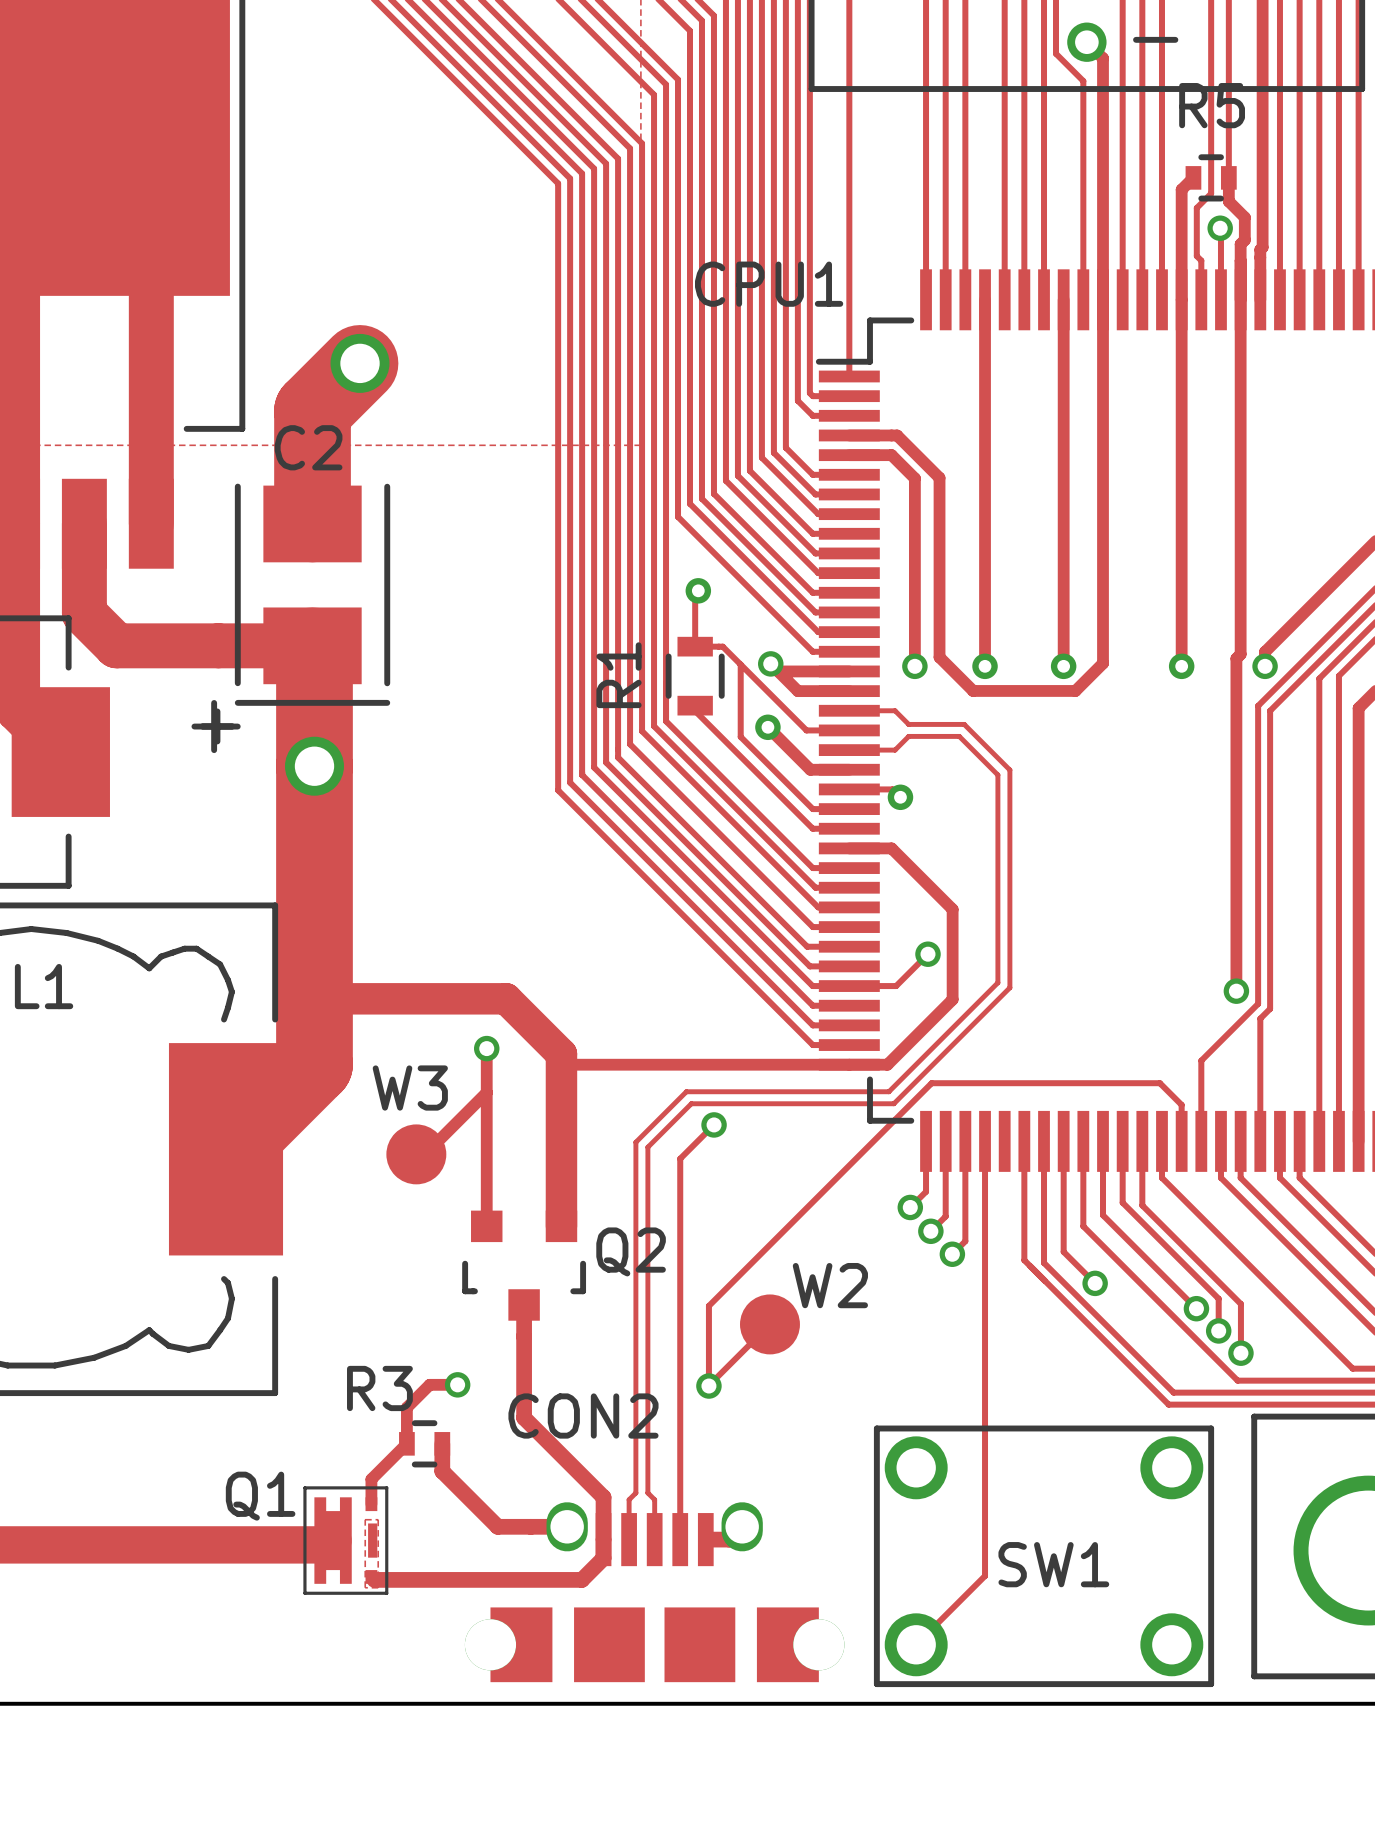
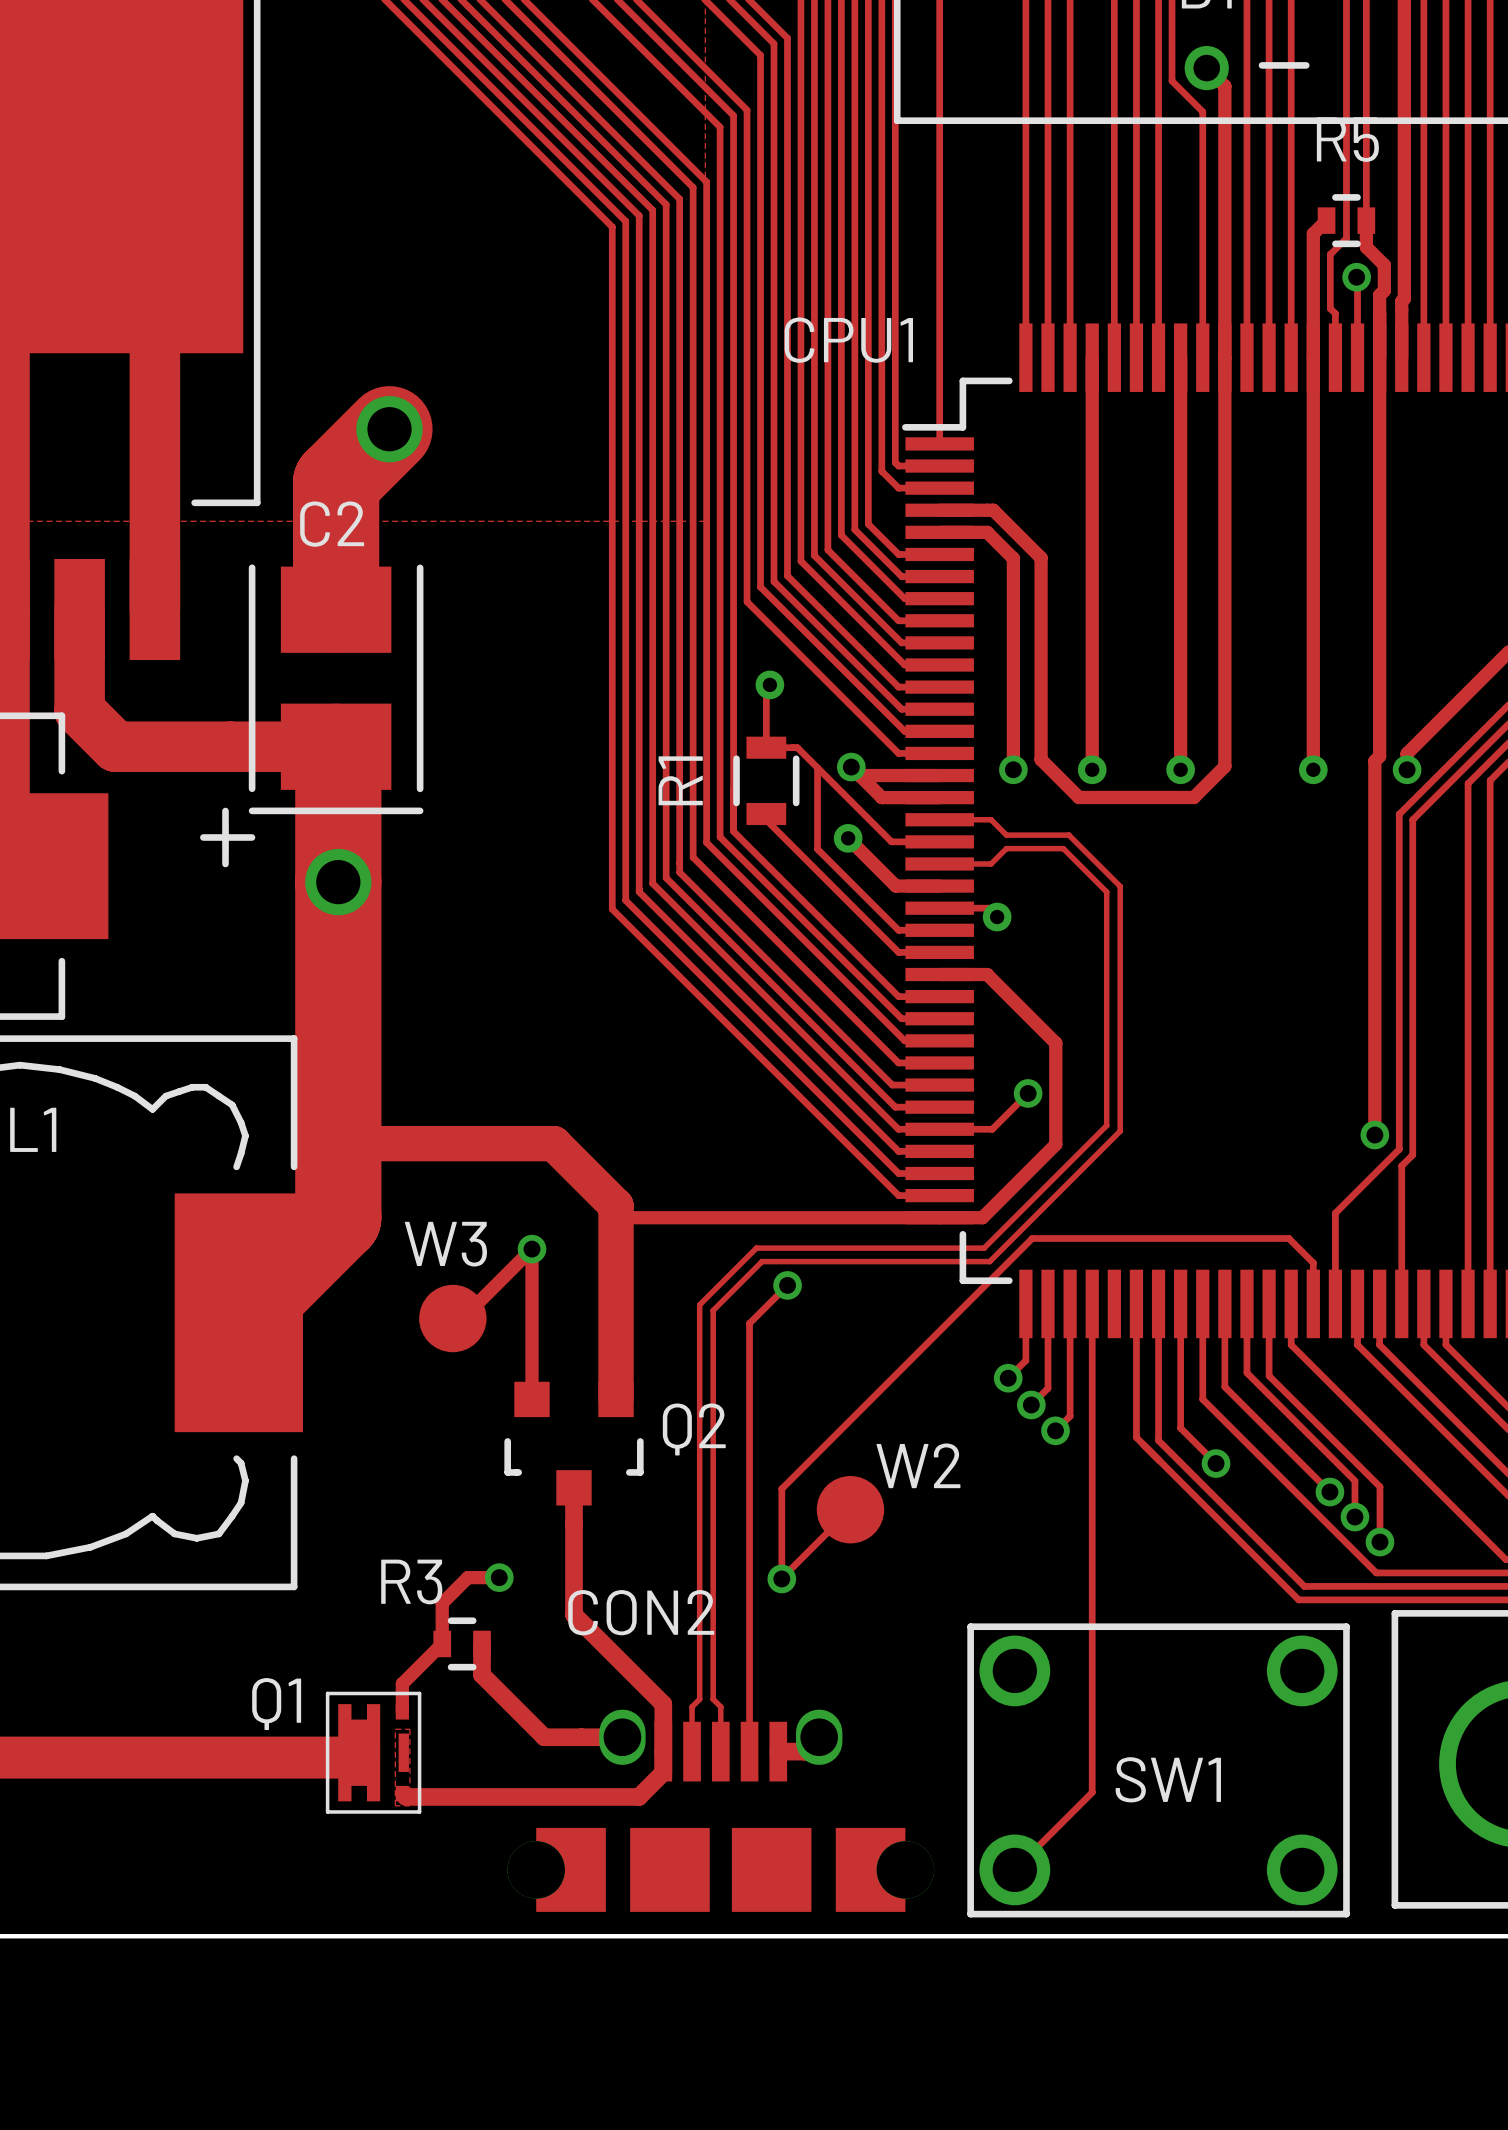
track: (486, 1048) (486, 1092) -> none
via position: (486, 1048) -> (532, 1249)

